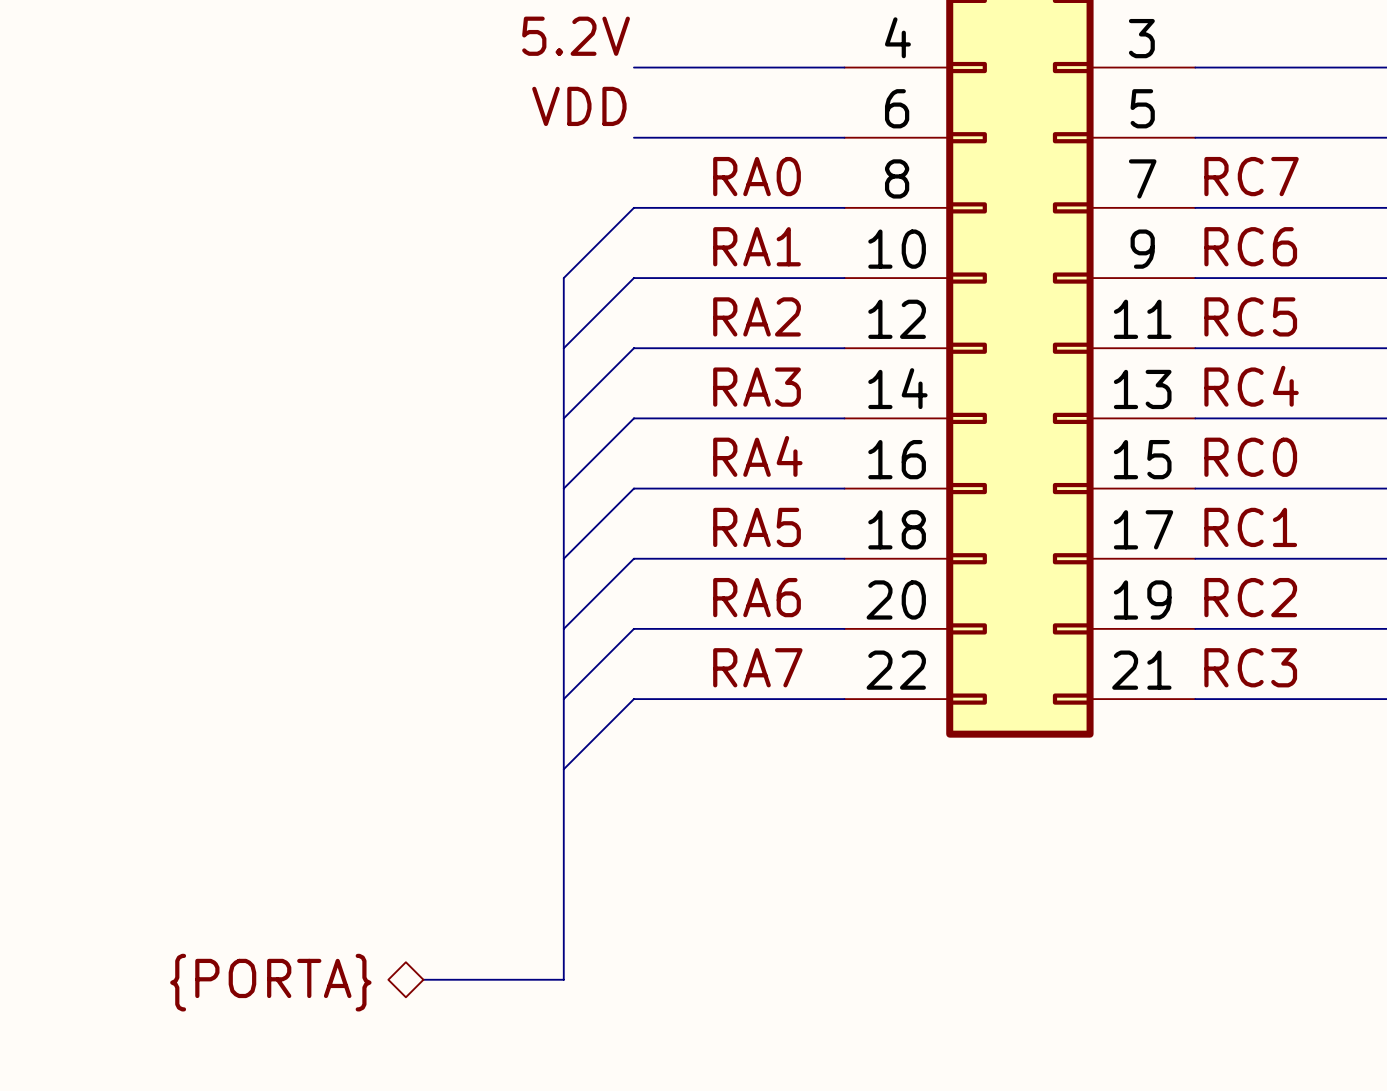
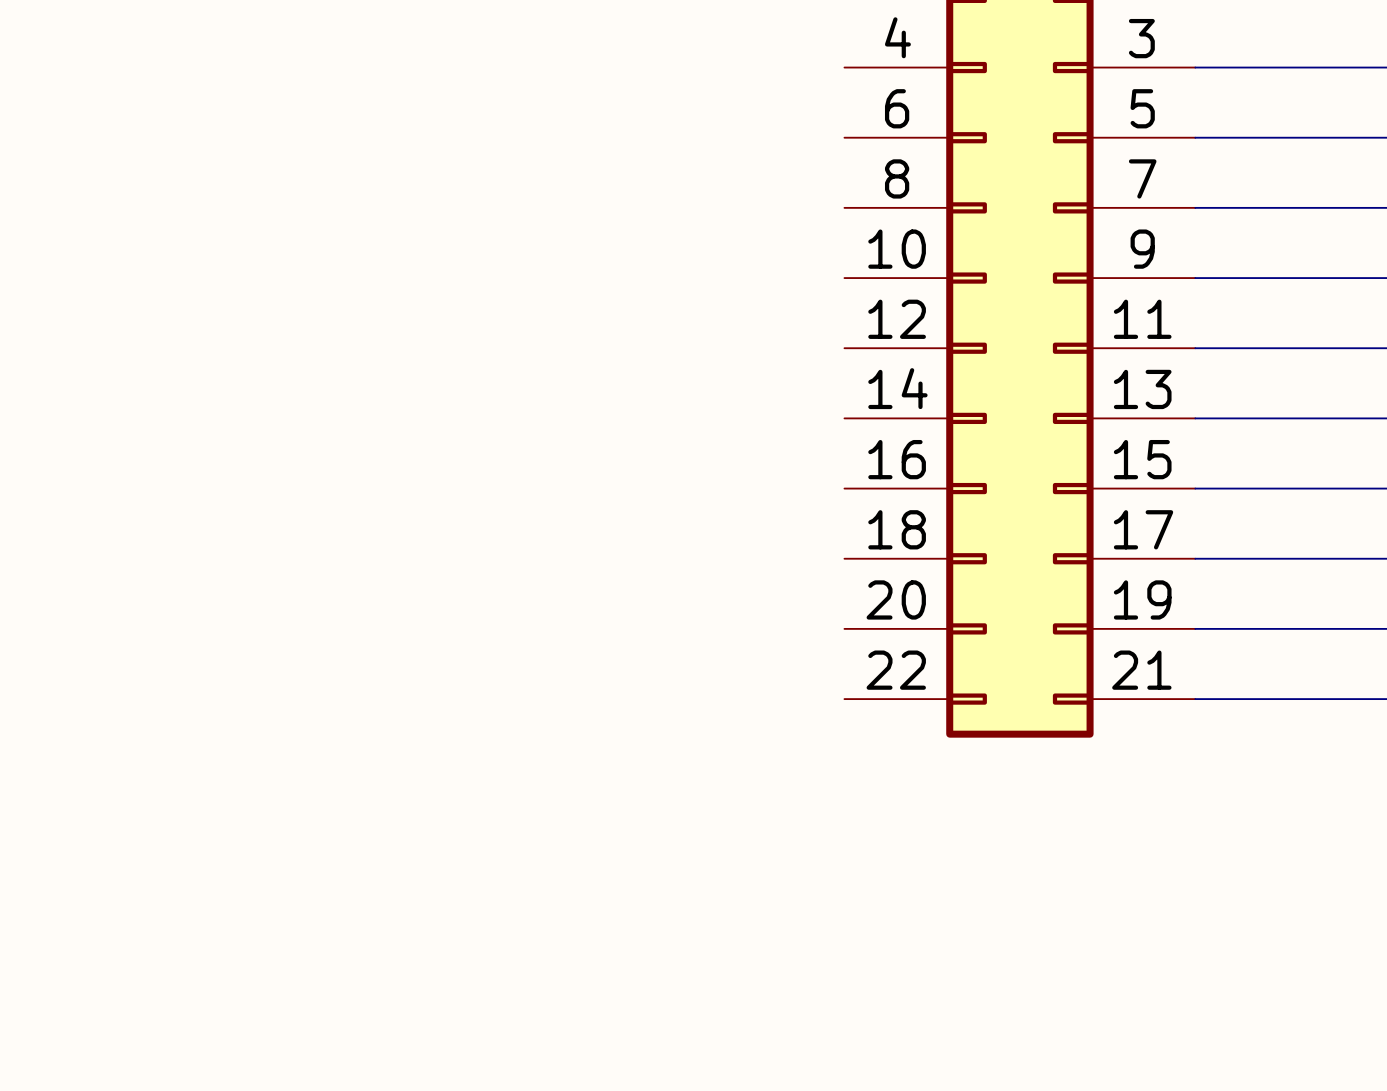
label: 5.2V (576, 36) -> none
wire: (633, 67) (844, 67) -> none
label: VDD (579, 106) -> none
wire: (633, 137) (844, 137) -> none
label: RA0 (757, 176) -> none
label: RC7 (1251, 176) -> none
wire: (844, 207) (633, 207) (563, 278) -> none
label: RA1 (757, 246) -> none
label: RC6 (1250, 246) -> none
bus: (563, 278) (563, 979) (423, 979) -> none
wire: (844, 278) (633, 278) (563, 348) -> none
label: RA2 (757, 316) -> none
label: RC5 (1250, 316) -> none
wire: (844, 348) (633, 348) (563, 418) -> none
label: RC4 (1251, 386) -> none
label: RA3 (757, 387) -> none
wire: (844, 418) (633, 418) (563, 488) -> none
label: RA4 (757, 456) -> none
label: RC0 (1250, 457) -> none
wire: (844, 488) (633, 488) (563, 558) -> none
label: RA5 (757, 527) -> none
label: RC1 (1250, 527) -> none
wire: (844, 558) (633, 558) (563, 628) -> none
label: RA6 (757, 597) -> none
label: RC2 (1250, 597) -> none
wire: (844, 628) (633, 628) (563, 699) -> none
label: RA7 (757, 667) -> none
label: RC3 (1250, 667) -> none
wire: (844, 699) (633, 699) (563, 769) -> none
hierarchical label: {PORTA} (270, 982) -> none

